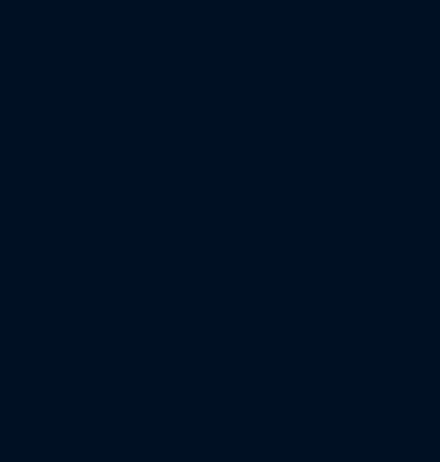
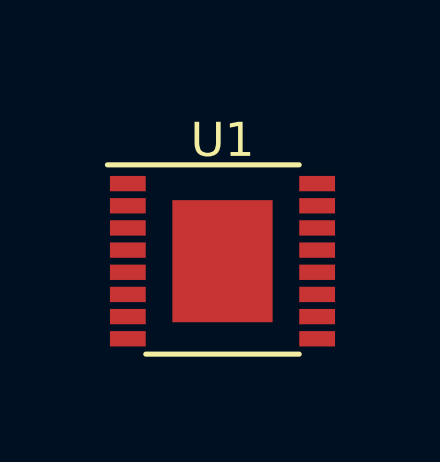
U1: none -> (219, 259)

